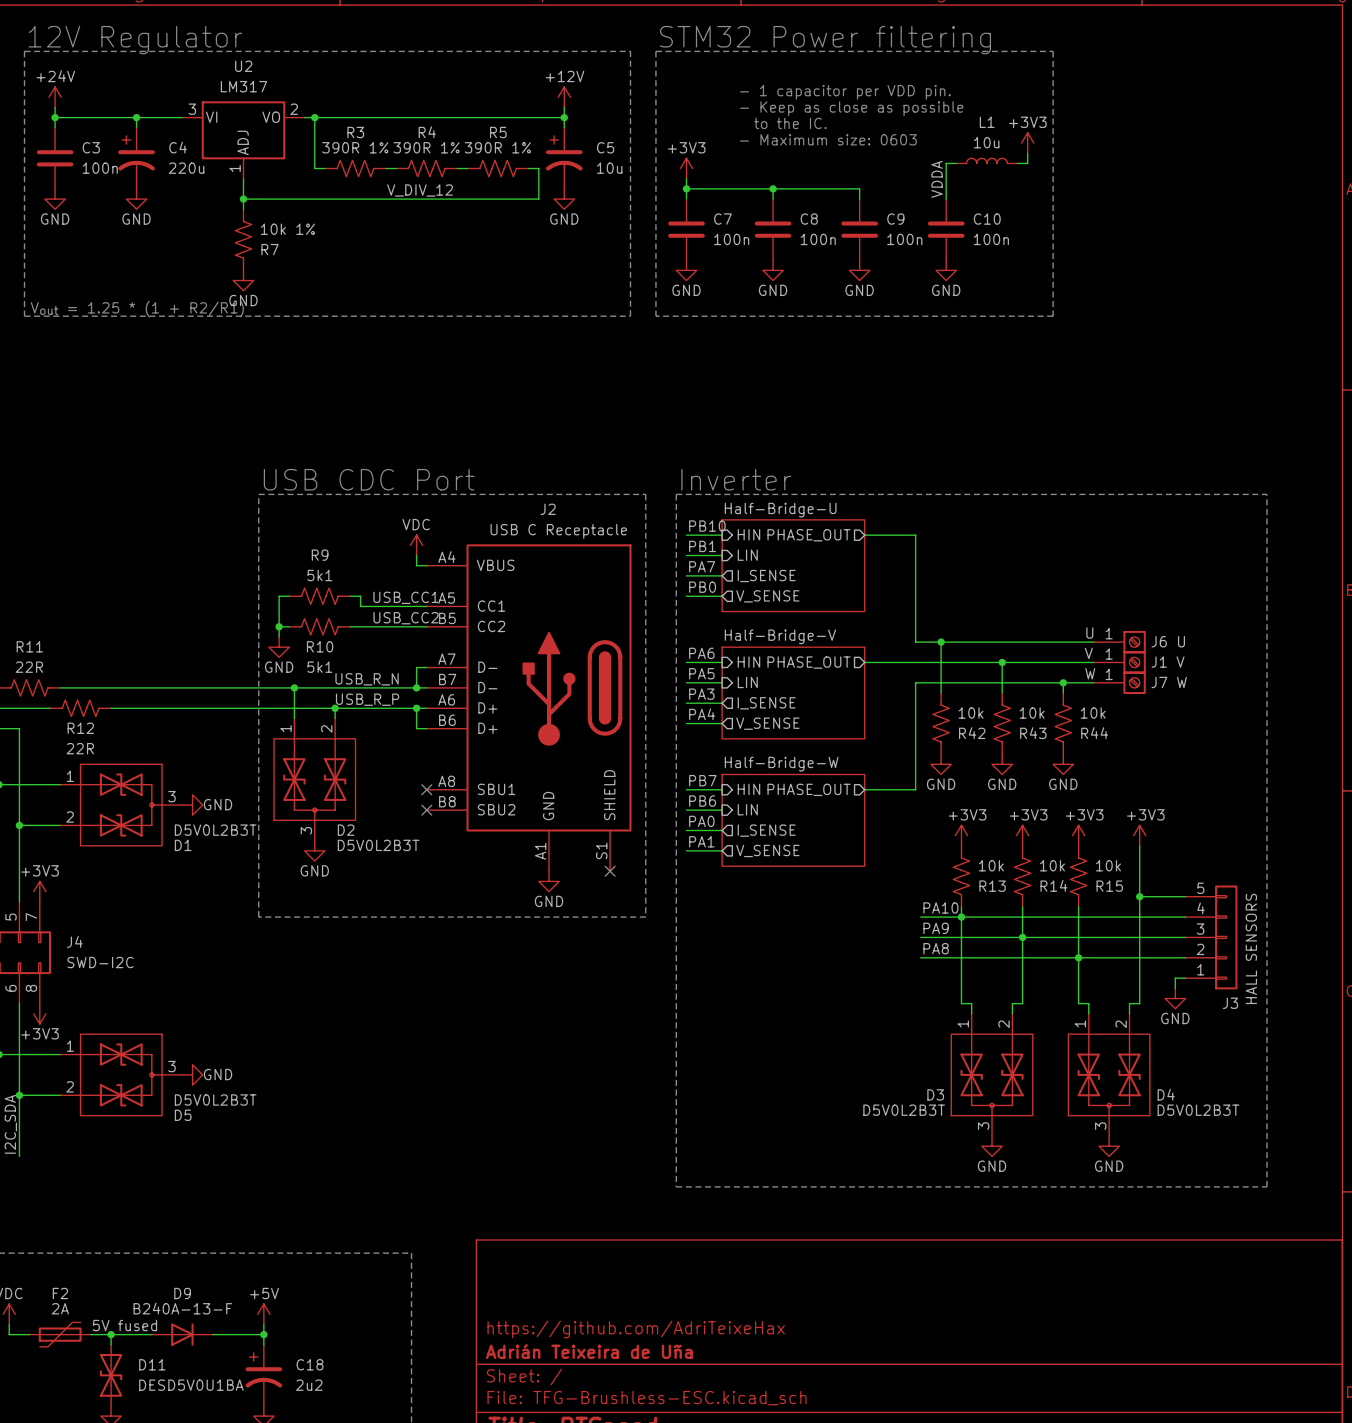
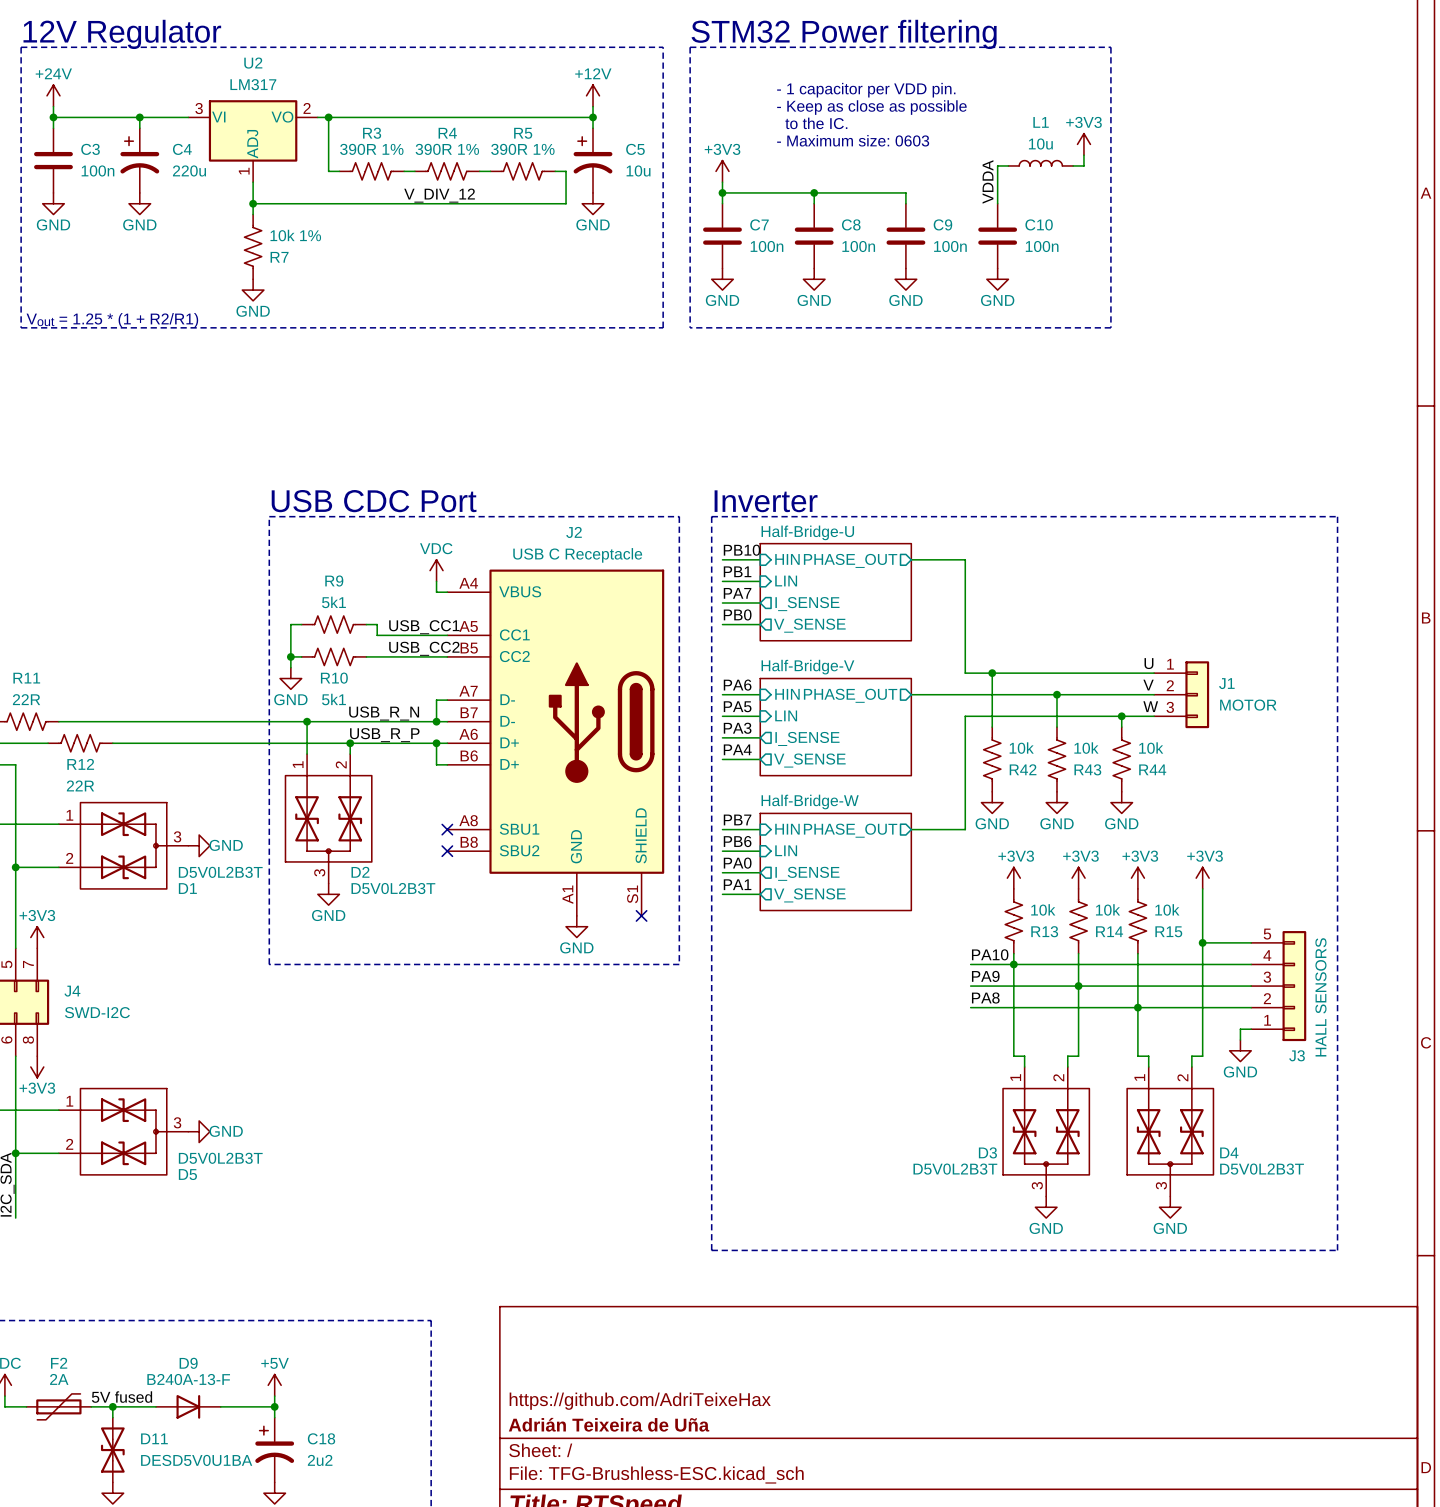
J6: U (1119, 642) -> none
J1 symbol: [1093, 651, 1146, 674] -> [1154, 661, 1210, 729]
J1 value: V (1180, 662) -> MOTOR (1248, 705)
J7: W (1119, 682) -> none

